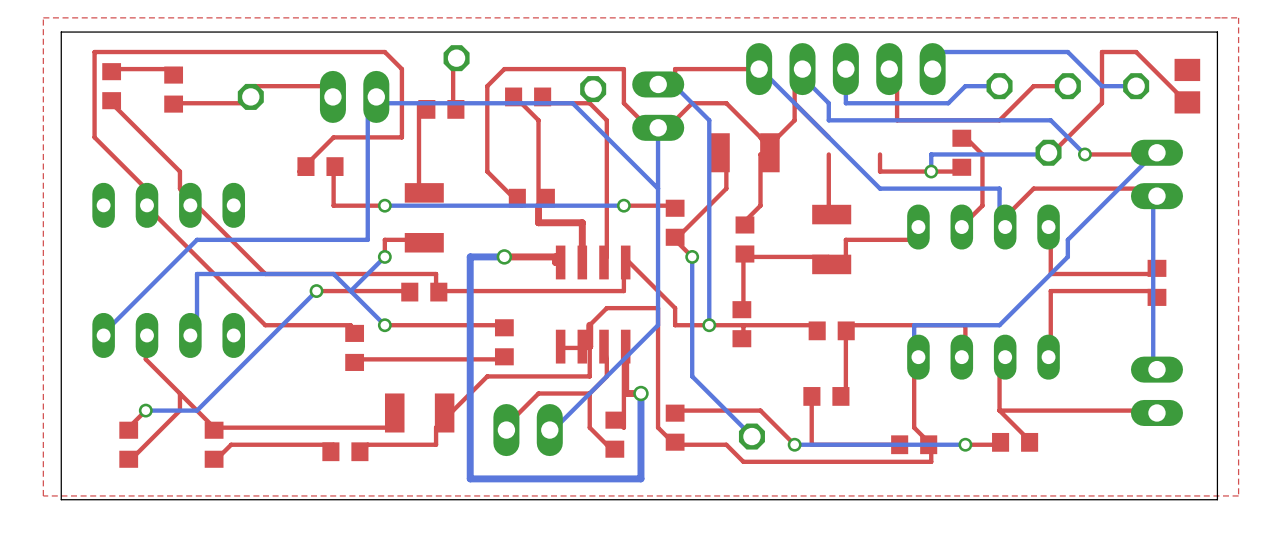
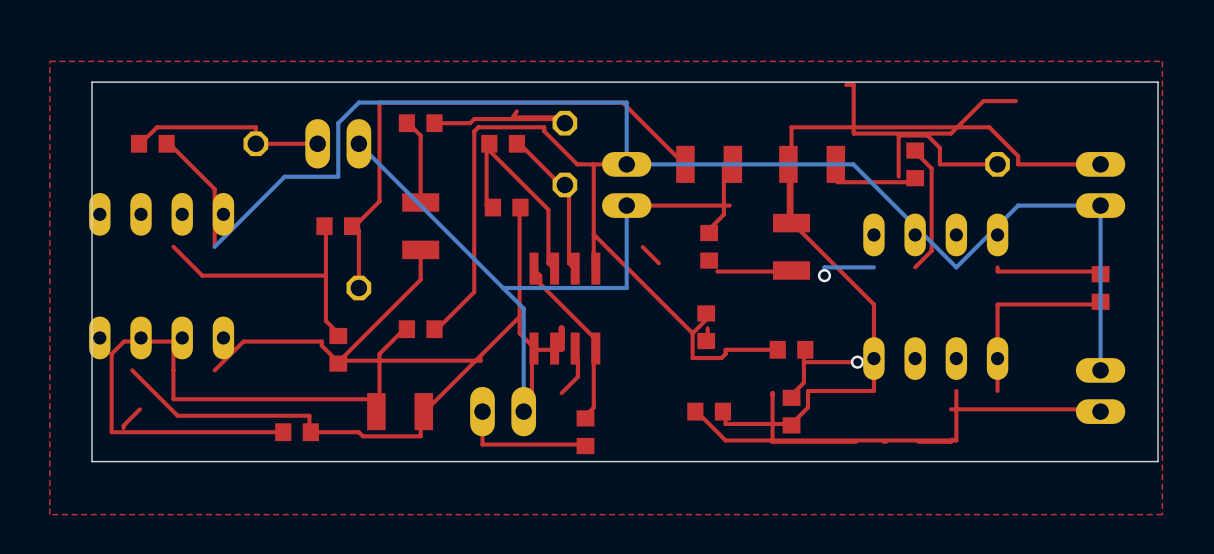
top zone outline: (1238, 17) (43, 17) (43, 495) (1238, 495) (1238, 17) -> (1162, 61) (1162, 514) (49, 514) (49, 61) (1162, 61)
top track: (456, 58) (453, 69) (453, 103) (455, 109) -> (564, 123) (564, 119) (474, 119) (470, 123) (434, 123)
part: (456, 58) -> none
board edge: (1217, 66) (1217, 32) (61, 32) (61, 499) (1217, 499) (1217, 465) -> (1158, 82) (92, 82) (92, 461) (1158, 461)
bottom track: (759, 69) (880, 188) (999, 188) (999, 222) (1005, 227) -> none
top track: (760, 69) (675, 69) (675, 86) (658, 84) -> none
top track: (802, 69) (794, 69) (794, 120) (777, 137) (769, 152) (760, 137) (726, 103) (692, 103) (675, 120) (658, 127) (658, 137) (623, 103) (623, 69) (504, 69) (487, 86) (487, 171) (521, 205) (517, 198) -> none
bottom track: (802, 69) (811, 69) (811, 86) (828, 103) (828, 120) (1050, 120) (1084, 154) -> none
bottom track: (845, 69) (845, 103) (948, 103) (965, 86) (999, 86) -> none
part: (845, 69) -> none
bottom track: (932, 69) (931, 52) (1067, 52) (1101, 86) (1136, 86) -> none
top track: (111, 71) (111, 69) (179, 69) (173, 75) -> none
bottom track: (658, 84) (675, 86) (709, 120) (709, 325) -> none
part: (111, 86) -> none
part: (999, 86) -> none
part: (1067, 86) -> none
part: (1136, 86) -> none
part: (1187, 86) -> none
part: (173, 89) -> none
top track: (593, 89) (589, 86) (589, 103) (606, 120) (606, 256) (604, 262) -> (516, 143) (519, 143) (560, 184) (564, 184) (569, 189) (569, 263) (575, 268)
part position: (593, 89) -> (564, 123)
part position: (250, 96) -> (255, 143)
top track: (332, 96) (333, 86) (248, 86) (250, 96) (248, 103) (173, 104) -> none
part position: (354, 96) -> (338, 143)
top track: (513, 96) (538, 120) (538, 205) -> none
part position: (528, 96) -> (503, 143)
top track: (111, 100) (111, 103) (179, 171) (179, 188) (190, 205) (197, 205) (265, 273) (436, 273) (436, 291) -> none
top track: (1187, 102) (1136, 52) (1101, 52) (1101, 103) (1050, 154) (1048, 152) -> (898, 176) (898, 135) (927, 135) (939, 147) (939, 164) (997, 164)
part position: (658, 106) -> (626, 184)
top track: (426, 109) (418, 103) (418, 188) (424, 192) -> (406, 123) (420, 135) (420, 202)
bottom track: (658, 127) (658, 325) (555, 427) (549, 430) -> none
part: none -> (152, 143)
top track: none -> (166, 143) (169, 143) (214, 189) (214, 246)
top track: none -> (317, 143) (255, 143) (255, 127) (156, 127) (139, 143)
bottom track: none -> (358, 143) (523, 308) (523, 411)
top track: (961, 138) (965, 137) (982, 154) (982, 205) (961, 227) -> (915, 150) (931, 168) (931, 250) (915, 267)
top track: none -> (593, 164) (593, 267) (595, 268)
top track: none -> (626, 164) (577, 164) (544, 131) (544, 127) (478, 127) (474, 131) (474, 292) (437, 329) (434, 329)
top track: (720, 152) (726, 154) (726, 188) (675, 239) (675, 237) -> (685, 164) (622, 102) (379, 102) (379, 201) (354, 226)
part: none -> (812, 164)
bottom track: (1048, 152) (1050, 154) (931, 154) (931, 171) -> none
top track: (1156, 152) (1153, 154) (1084, 154) -> (1100, 164) (1018, 164) (1018, 156) (989, 127) (791, 127) (791, 223)
bottom track: (1156, 152) (1067, 239) (1067, 256) (999, 325) (914, 325) (914, 342) (918, 357) -> none
via: (1084, 154) -> none
top track: (305, 166) (299, 171) (333, 137) (401, 137) (401, 69) (384, 52) (94, 52) (94, 137) (145, 188) (145, 205) (265, 325) (350, 325) (354, 333) -> (324, 226) (325, 320) (338, 333) (338, 336)
part: (320, 166) -> none
top track: (334, 166) (333, 205) (384, 205) -> none
via: (931, 171) -> none
part: none -> (564, 184)
bottom track: (658, 188) (572, 103) (384, 103) (376, 96) (367, 103) (367, 239) (197, 239) (103, 335) -> none
top track: none -> (516, 205) (519, 205) (519, 333) (534, 348) (531, 349) (531, 403) (523, 411)
bottom track: none -> (626, 205) (626, 287) (503, 287)
top track: none -> (729, 205) (626, 205)
top track: (1156, 196) (1153, 188) (1033, 188) (999, 222) (1005, 227) -> none
bottom track: (1156, 196) (1153, 205) (1153, 359) (1156, 369) -> (214, 246) (284, 176) (338, 176) (338, 123) (358, 102) (626, 102) (626, 164) (853, 164) (956, 267) (1018, 205) (1100, 205) (1100, 370)
via: (384, 205) -> none
top track: (538, 205) (538, 222) (582, 222) (582, 262) -> (489, 205) (486, 205) (486, 143) (489, 143) (486, 147) (548, 209) (548, 263) (554, 268)
top track: (623, 205) (675, 205) (675, 208) -> none
bottom track: (623, 205) (384, 205) -> none
via: (623, 205) -> none
top track: none -> (791, 222) (873, 304) (873, 391) (808, 391) (808, 407) (791, 423)
part: none -> (338, 226)
top track: none -> (354, 226) (358, 230) (358, 287)
part position: (424, 217) -> (420, 226)
part: (675, 222) -> none
top track: none -> (593, 234) (692, 333)
top track: (918, 227) (914, 239) (845, 239) (845, 256) (831, 264) (828, 256) (743, 256) (741, 309) -> none
top track: (1048, 227) (1050, 239) (1050, 273) (1153, 273) (1156, 268) -> (997, 267) (997, 271) (1100, 271) (1100, 274)
top track: none -> (173, 246) (202, 275) (325, 275)
top track: (424, 242) (418, 239) (384, 239) (384, 256) -> none
top track: none -> (420, 249) (420, 279) (338, 362) (321, 345) (321, 341) (243, 341) (214, 370)
bottom track: (384, 256) (350, 291) -> none
via: (384, 256) -> none
top track: (504, 256) (555, 256) (555, 262) (560, 262) -> none
bottom track: (504, 256) (470, 256) (470, 478) (640, 478) (640, 393) -> none
via: (504, 256) -> none
bottom track: (692, 256) (692, 376) (751, 436) -> none
via: (692, 256) -> none
bottom track: none -> (873, 267) (824, 267) (824, 275)
top track: none -> (791, 271) (717, 271)
via: none -> (824, 275)
part: none -> (358, 287)
top track: (316, 291) (409, 292) -> none
bottom track: (316, 291) (197, 410) (145, 410) -> none
via: (316, 291) -> none
top track: (436, 291) (623, 291) (625, 262) (623, 256) (675, 308) (675, 325) (811, 325) (817, 330) -> none
part: (424, 292) -> none
top track: (1156, 297) (1153, 291) (1050, 291) (1050, 342) (1048, 357) -> (1100, 301) (1100, 304) (997, 304) (997, 391)
top track: none -> (709, 315) (692, 333)
top track: none -> (519, 316) (424, 411) (420, 411) (420, 436) (363, 436) (358, 432) (309, 432) (309, 415) (177, 415) (132, 370)
top track: (384, 325) (504, 325) (504, 327) -> none
bottom track: (384, 325) (333, 273) (197, 273) (197, 325) (190, 335) -> none
via: (384, 325) -> none
via: (709, 325) -> none
top track: (845, 325) (965, 325) (965, 342) (961, 357) -> none
top track: (845, 325) (845, 393) (840, 396) -> none
top track: none -> (406, 329) (404, 329) (379, 353) (379, 411) (376, 411) (379, 399) (173, 399) (173, 341) (124, 341) (111, 353) (111, 432) (283, 432)
part: none -> (420, 329)
top track: none -> (692, 333) (692, 358) (721, 358) (725, 353) (725, 349) (777, 349)
part position: (831, 330) -> (791, 349)
top track: (146, 335) (145, 359) (214, 427) -> none
part: (504, 342) -> none
top track: none -> (805, 349) (803, 382) (791, 395) (791, 397)
top track: (918, 357) (914, 359) (914, 427) (931, 444) (931, 461) (743, 461) (726, 444) (675, 444) -> none
top track: (1005, 357) (999, 359) (999, 410) (1033, 444) (1029, 442) -> none
top track: none -> (857, 362) (803, 362)
via: none -> (857, 362)
top track: none -> (956, 391) (956, 440) (725, 440) (695, 411)
top track: (179, 393) (179, 410) (128, 461) (128, 459) -> none
top track: (640, 393) (625, 393) (625, 346) (623, 359) (623, 427) (614, 420) -> (534, 268) (540, 275) (540, 283) (593, 337) (593, 345) (595, 348) (593, 349) (593, 407) (585, 415) (585, 418)
via: (640, 393) -> none
part rotation: 0° (826, 396) -> 90° clockwise (791, 411)
via: (145, 410) -> none
top track: (394, 412) (401, 427) (214, 427) -> none
part: none -> (709, 411)
top track: none -> (722, 411) (725, 411) (725, 423) (791, 423)
top track: (675, 413) (675, 410) (760, 410) (794, 444) -> none
part: (675, 427) -> none
top track: (506, 430) (504, 427) (538, 393) (589, 393) (589, 427) (606, 444) (614, 449) -> (482, 411) (482, 444) (585, 446)
part position: (528, 430) -> (503, 411)
part: (751, 436) -> none
part: (1015, 442) -> none
part: (128, 444) -> none
part: (214, 444) -> none
top track: (675, 444) (658, 427) (658, 308) (606, 308) (589, 325) (589, 376) (487, 376) (453, 410) (444, 412) (436, 427) (436, 444) (367, 444) (359, 451) -> none
via: (794, 444) -> none
part: (914, 444) -> none
bottom track: (965, 444) (794, 444) -> none
via: (965, 444) -> none
top track: (330, 451) (333, 444) (231, 444) (214, 461) (214, 459) -> none
part position: (345, 451) -> (297, 432)

